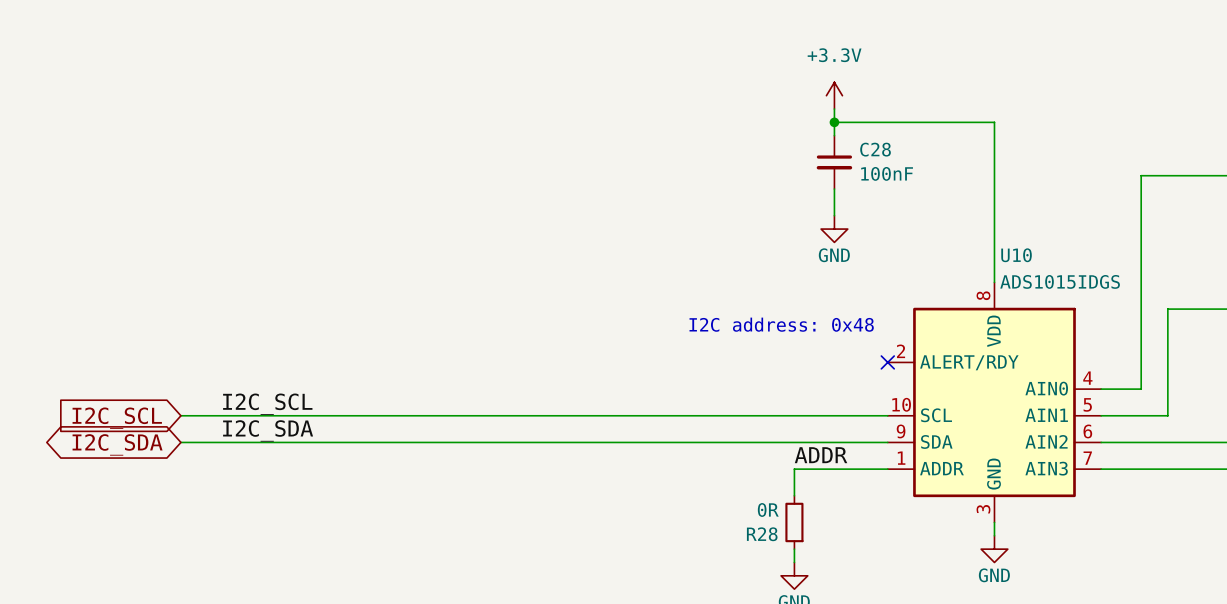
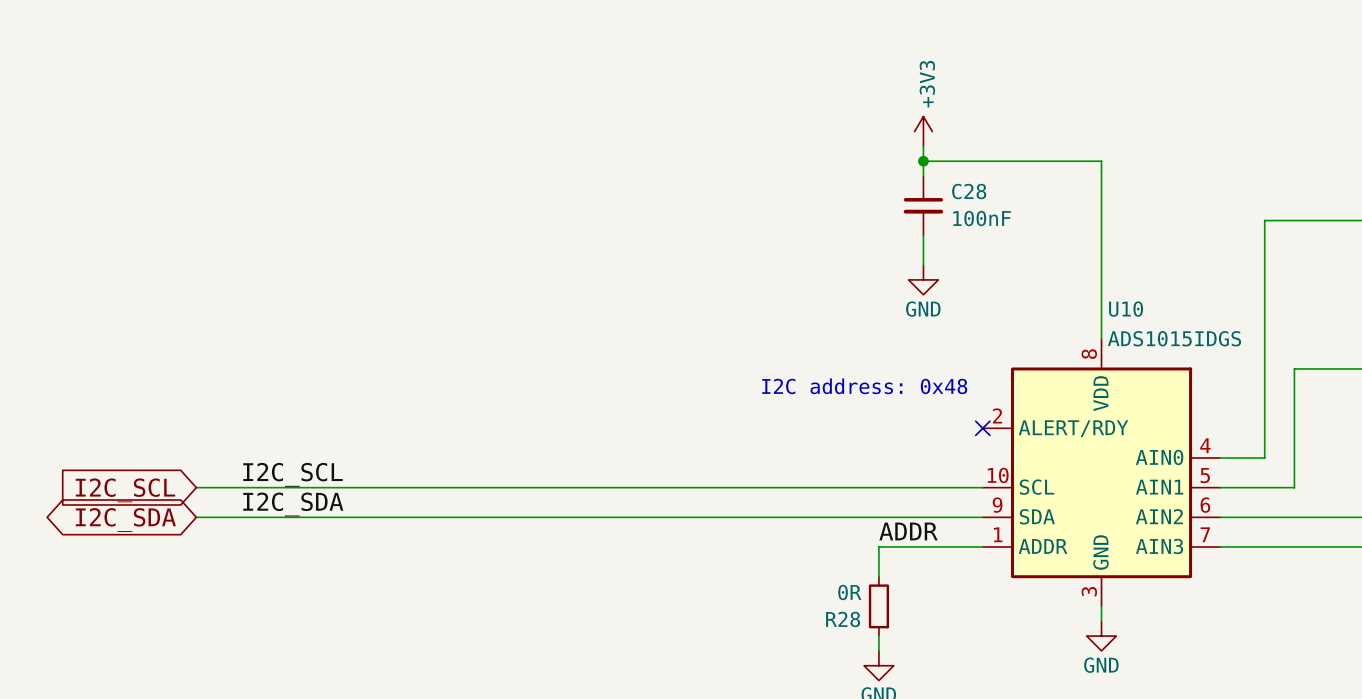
power symbol: +3.3V (834, 95) -> +3V3 (923, 131)

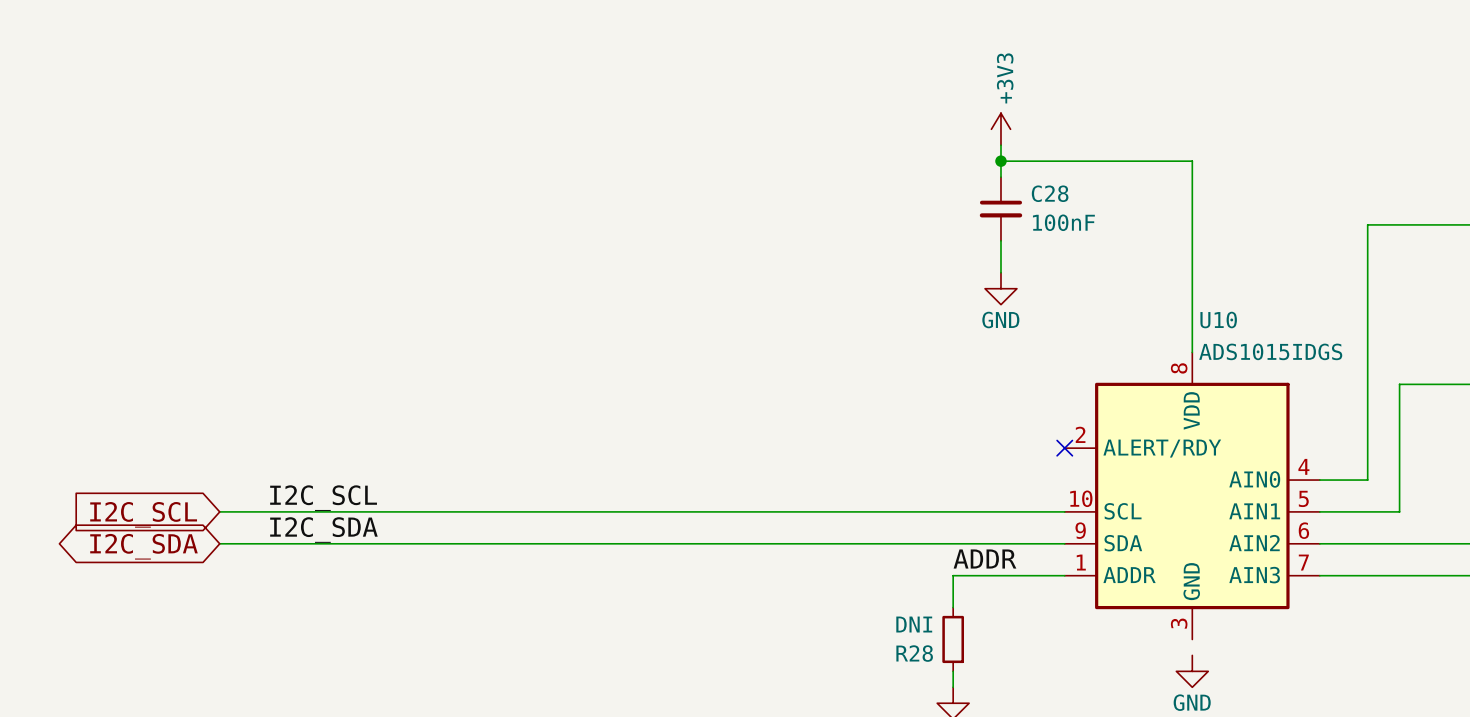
text: I2C address: 0x48 (864, 386) -> none
R28 value: 0R (849, 592) -> DNI (914, 624)
wire: (1101, 606) (1101, 621) -> none

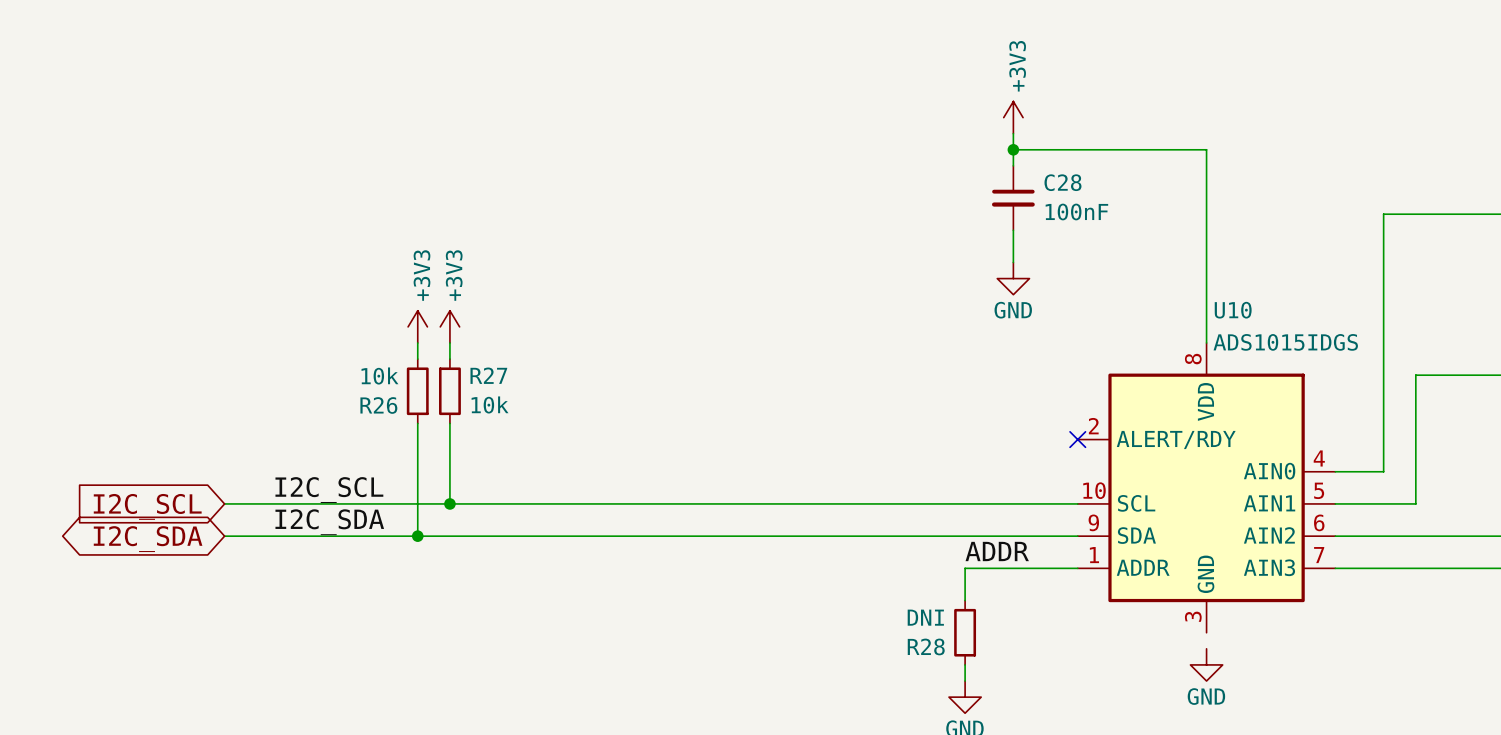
power symbol: none -> +3V3 (417, 326)
power symbol: none -> +3V3 (449, 326)
wire: none -> (417, 342) (417, 359)
wire: none -> (449, 342) (449, 359)
R26: none -> 10k (417, 391)
R27: none -> 10k (449, 391)
wire: none -> (417, 423) (417, 536)
wire: none -> (449, 423) (449, 503)
junction: none -> (449, 503)
junction: none -> (417, 536)

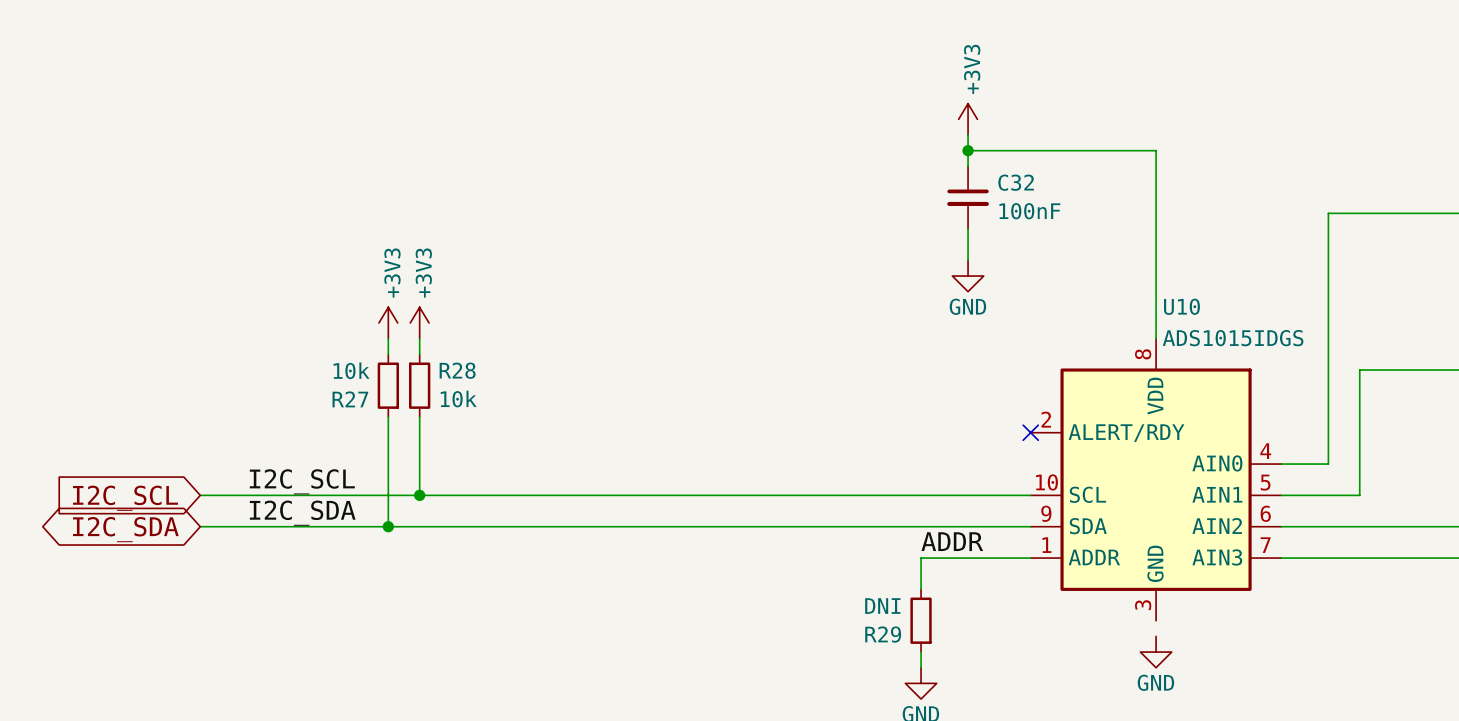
C28 name: C28 (1062, 182) -> C32 (1016, 182)
R27 name: R27 (488, 375) -> R28 (457, 370)
R26 name: R26 (378, 405) -> R27 (350, 399)
R28 name: R28 (926, 646) -> R29 (883, 634)

